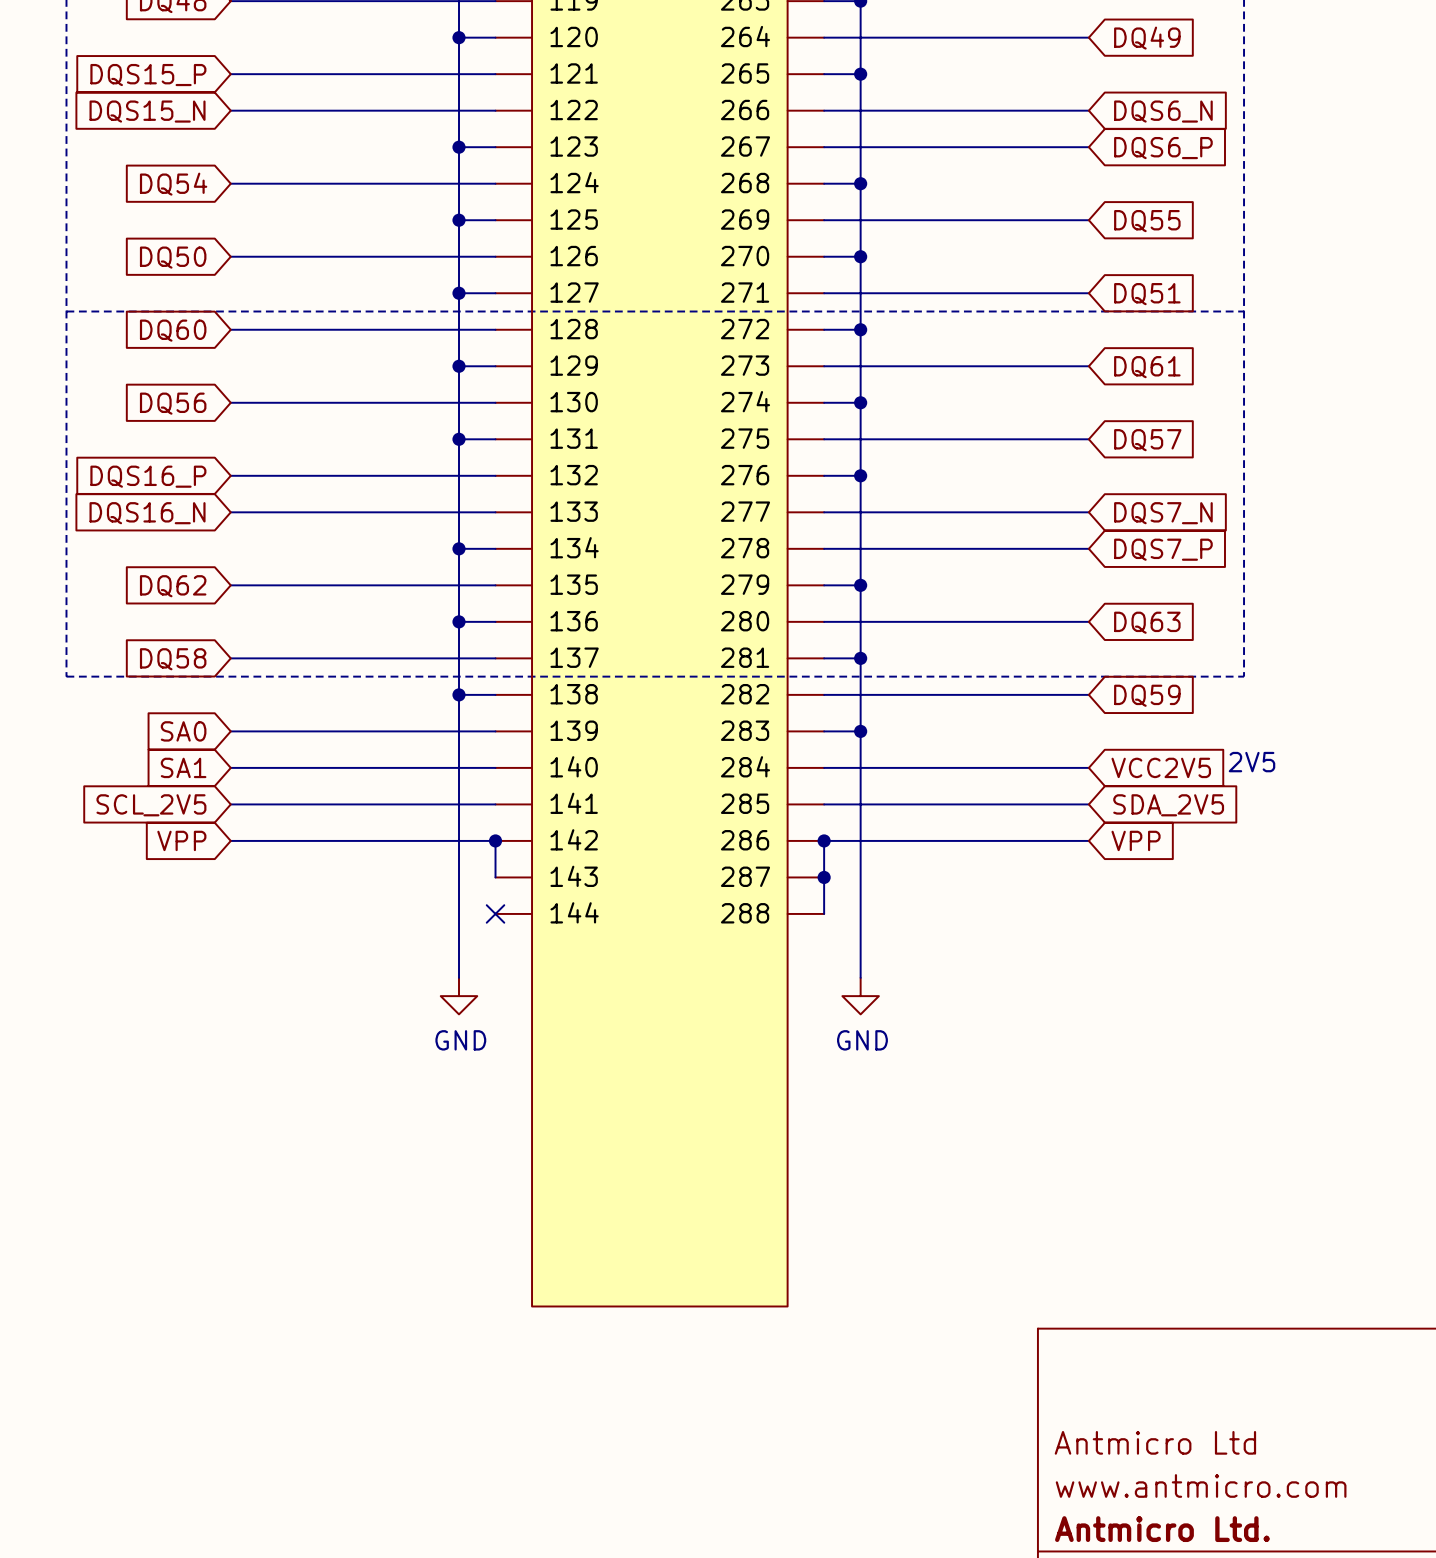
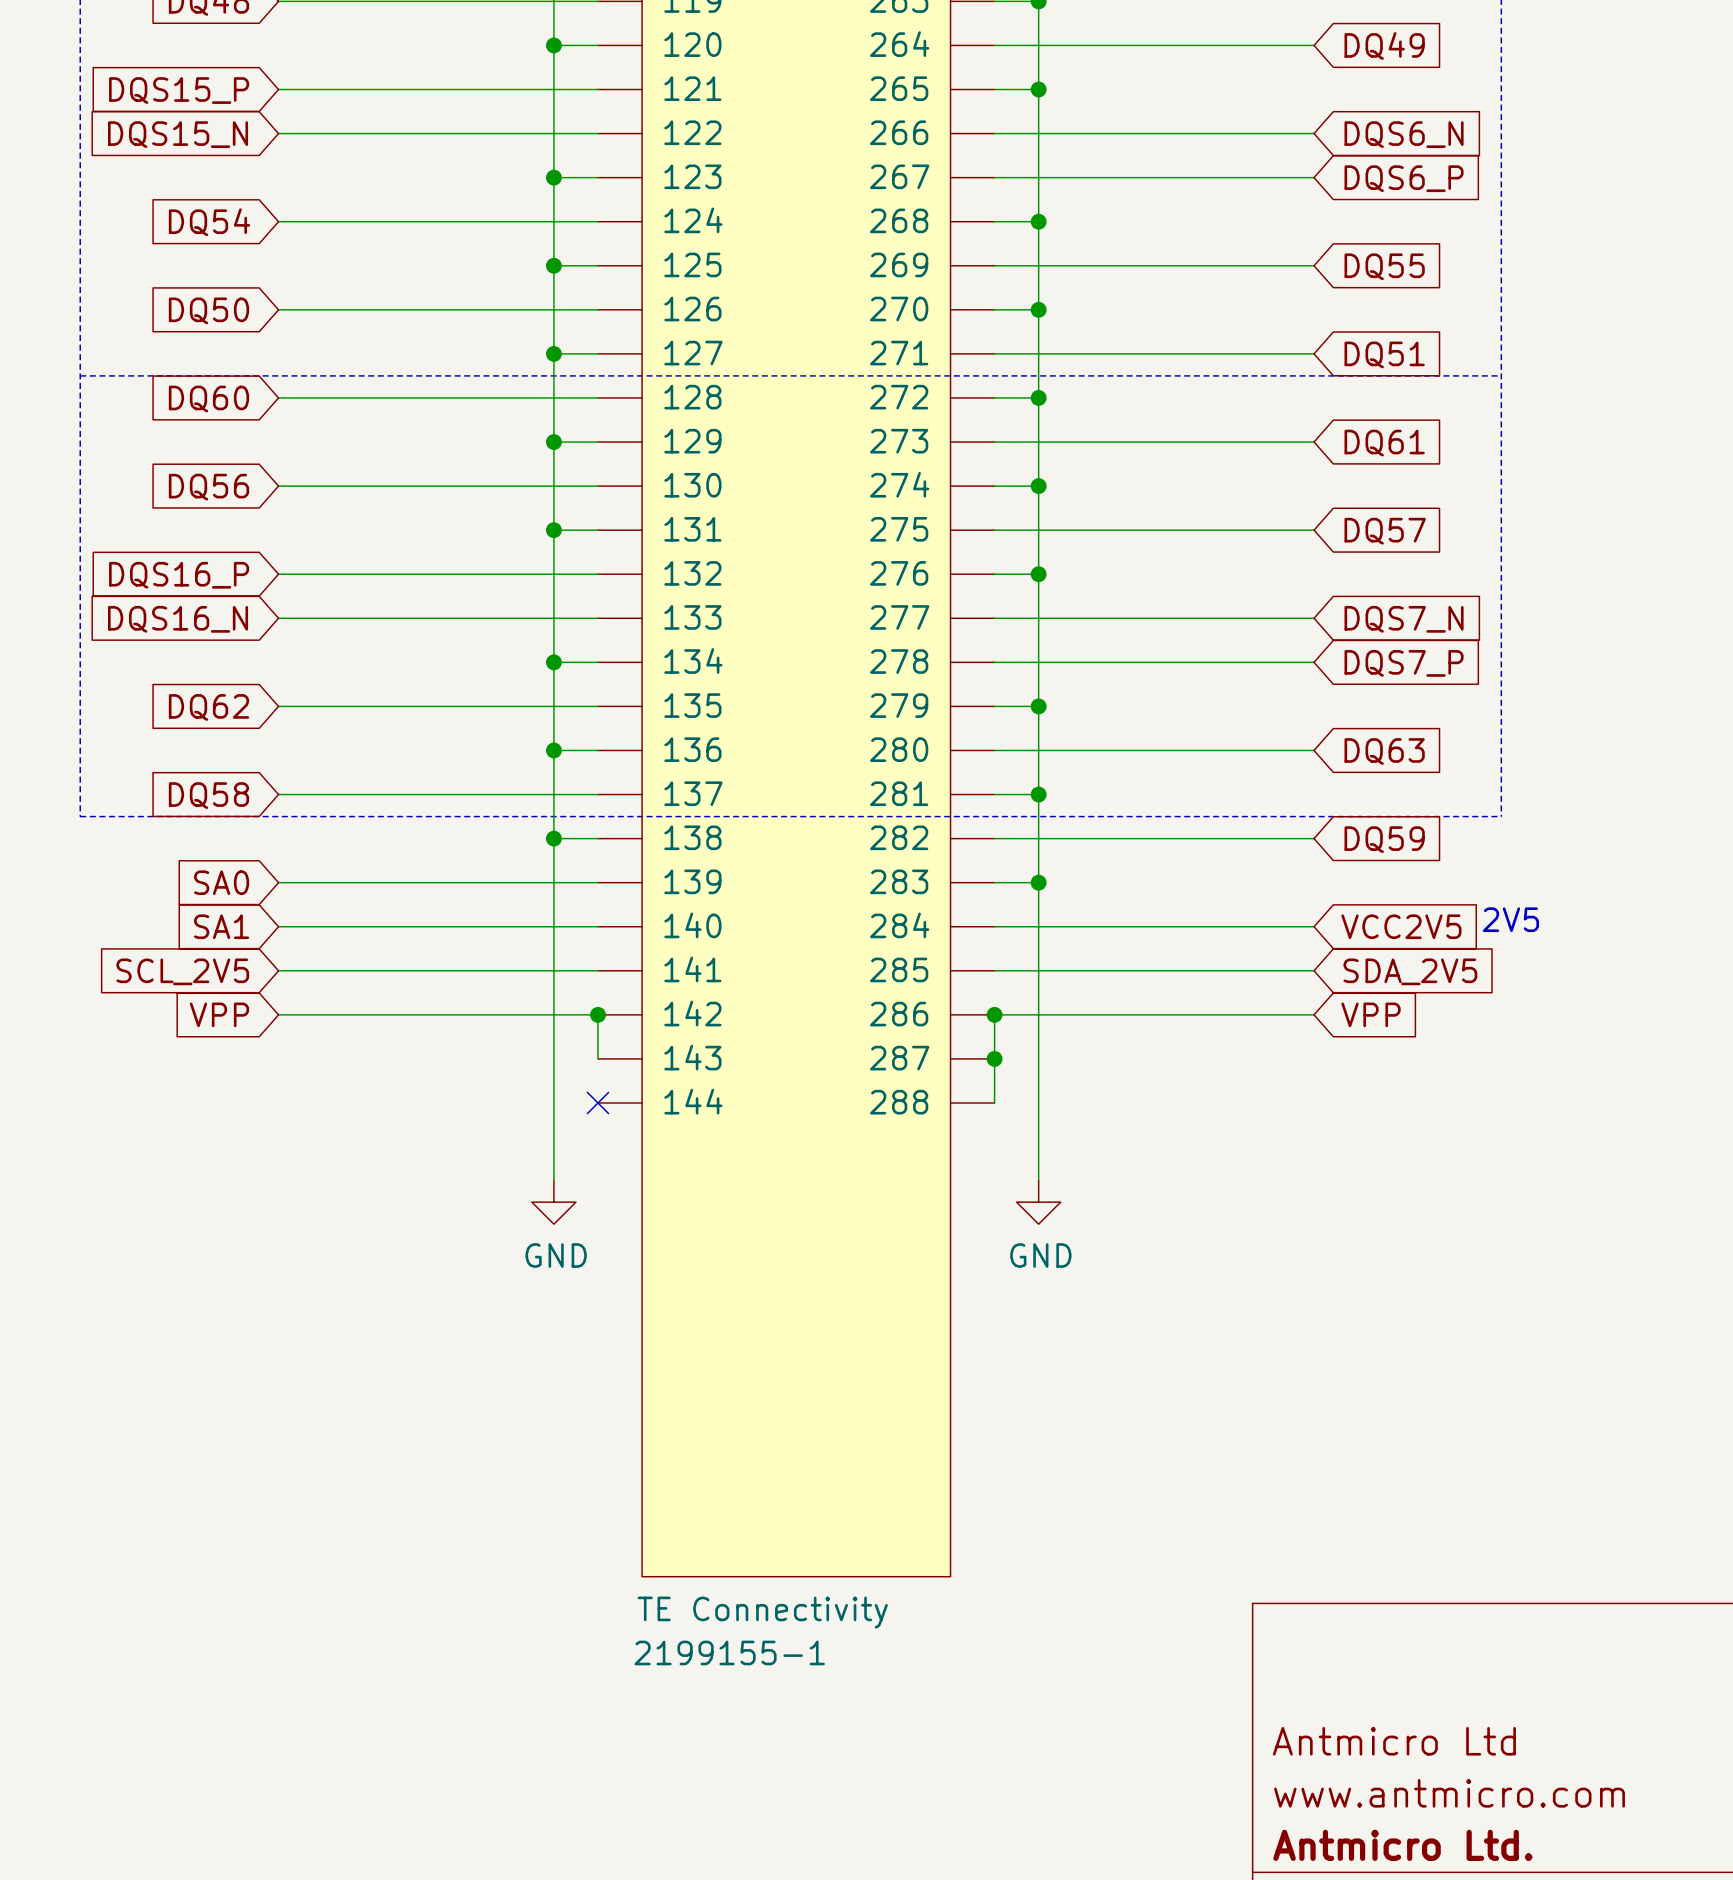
part text: none -> TE Connectivity (762, 1612)
part text: none -> 2199155-1 (729, 1652)

